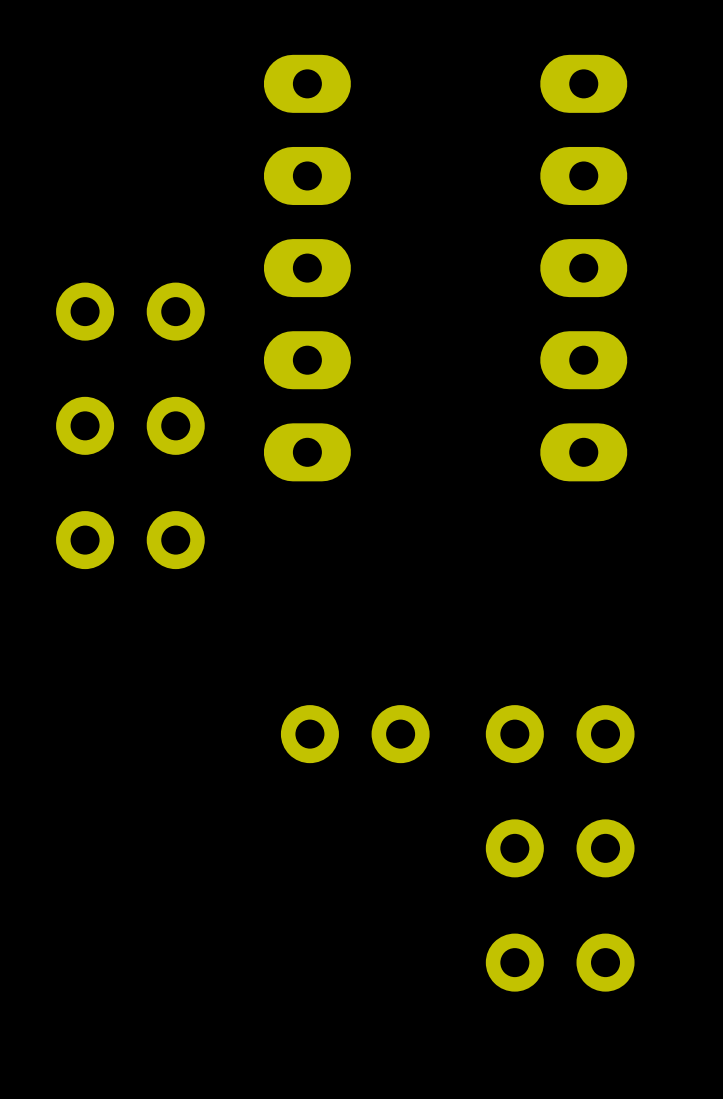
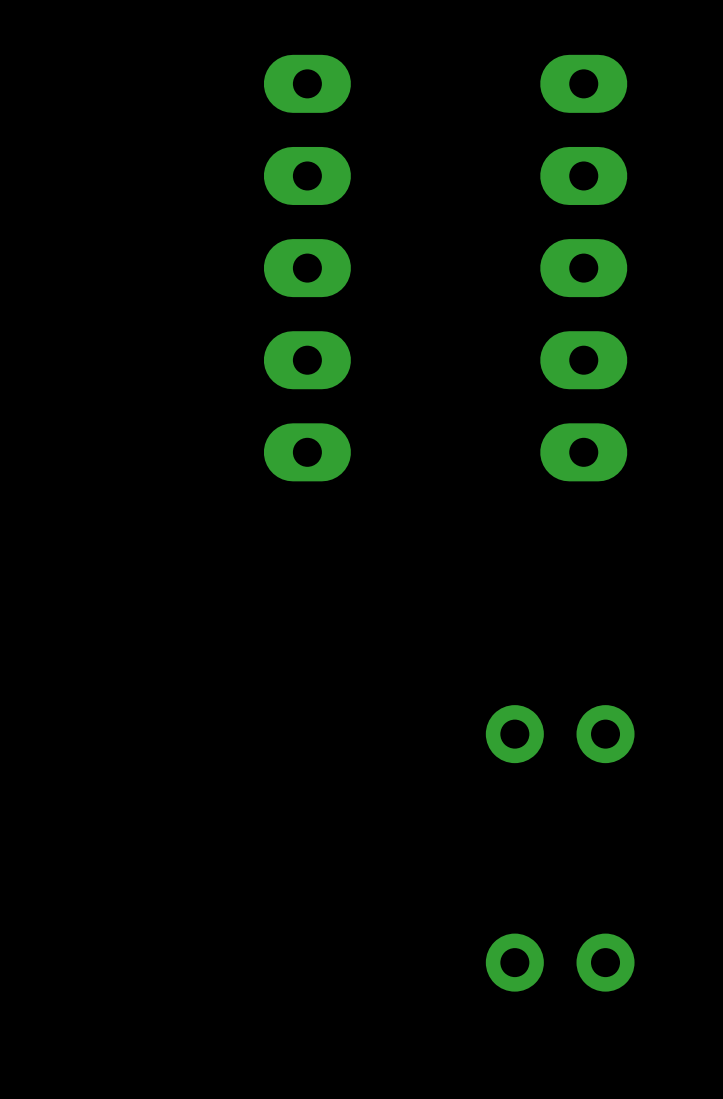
part: (130, 311) -> none
part: (130, 425) -> none
part: (130, 540) -> none
part: (355, 734) -> none
part: (560, 848) -> none

